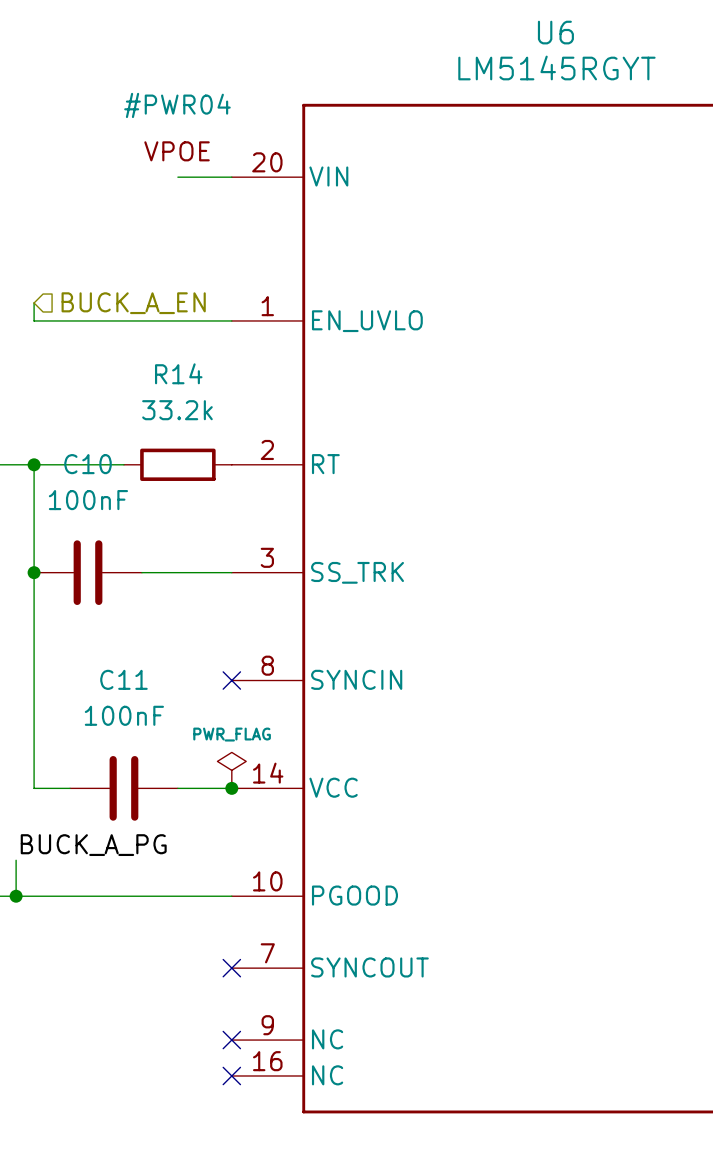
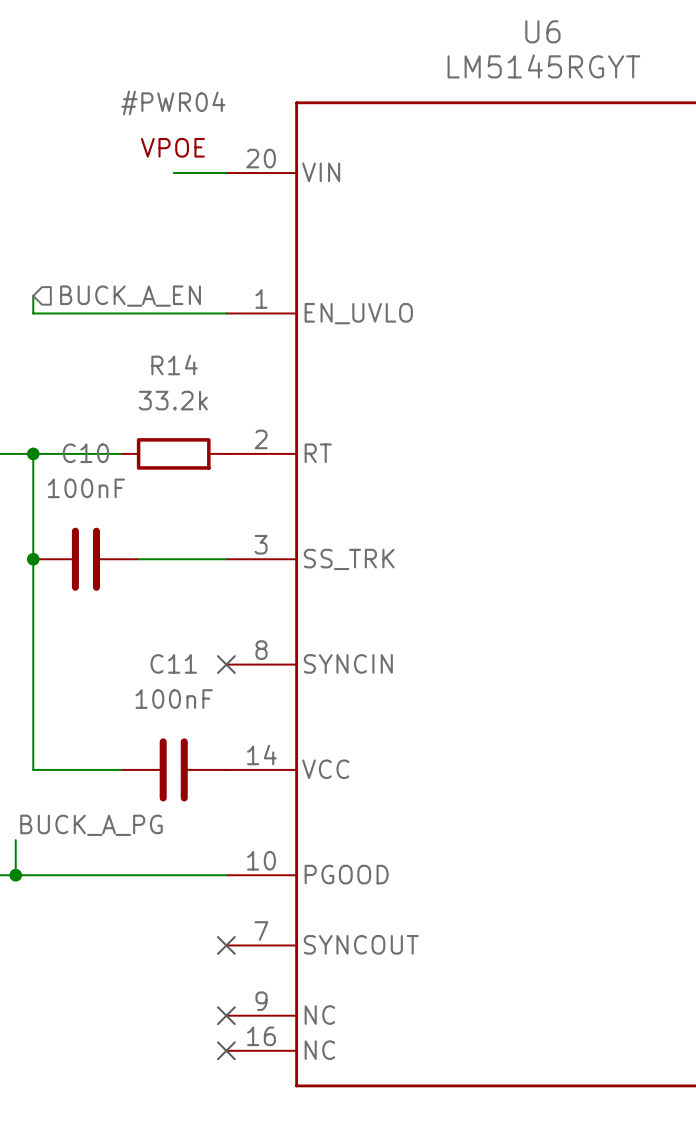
power symbol: PWR_FLAG (231, 770) -> none
C11 position: (123, 788) -> (173, 769)
junction: (231, 788) -> none

